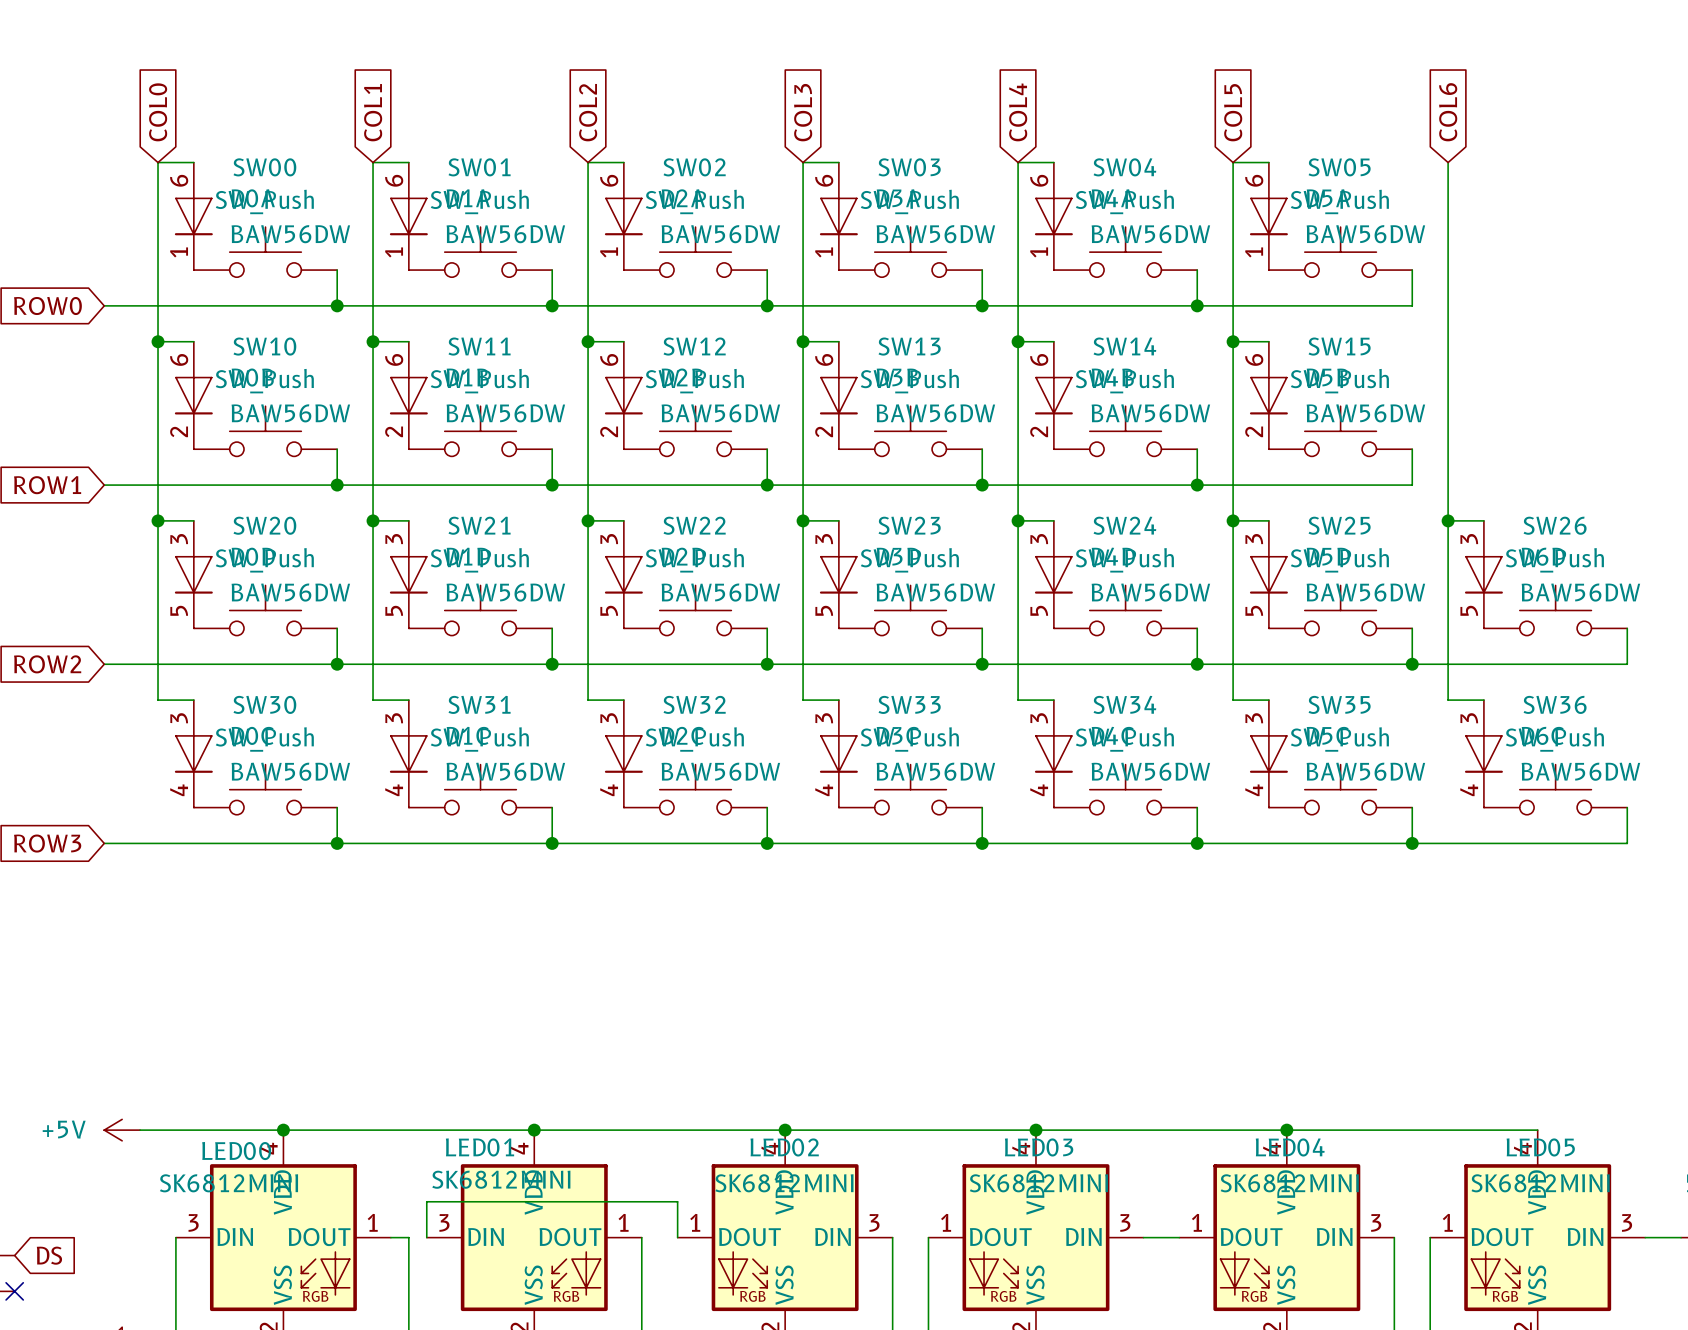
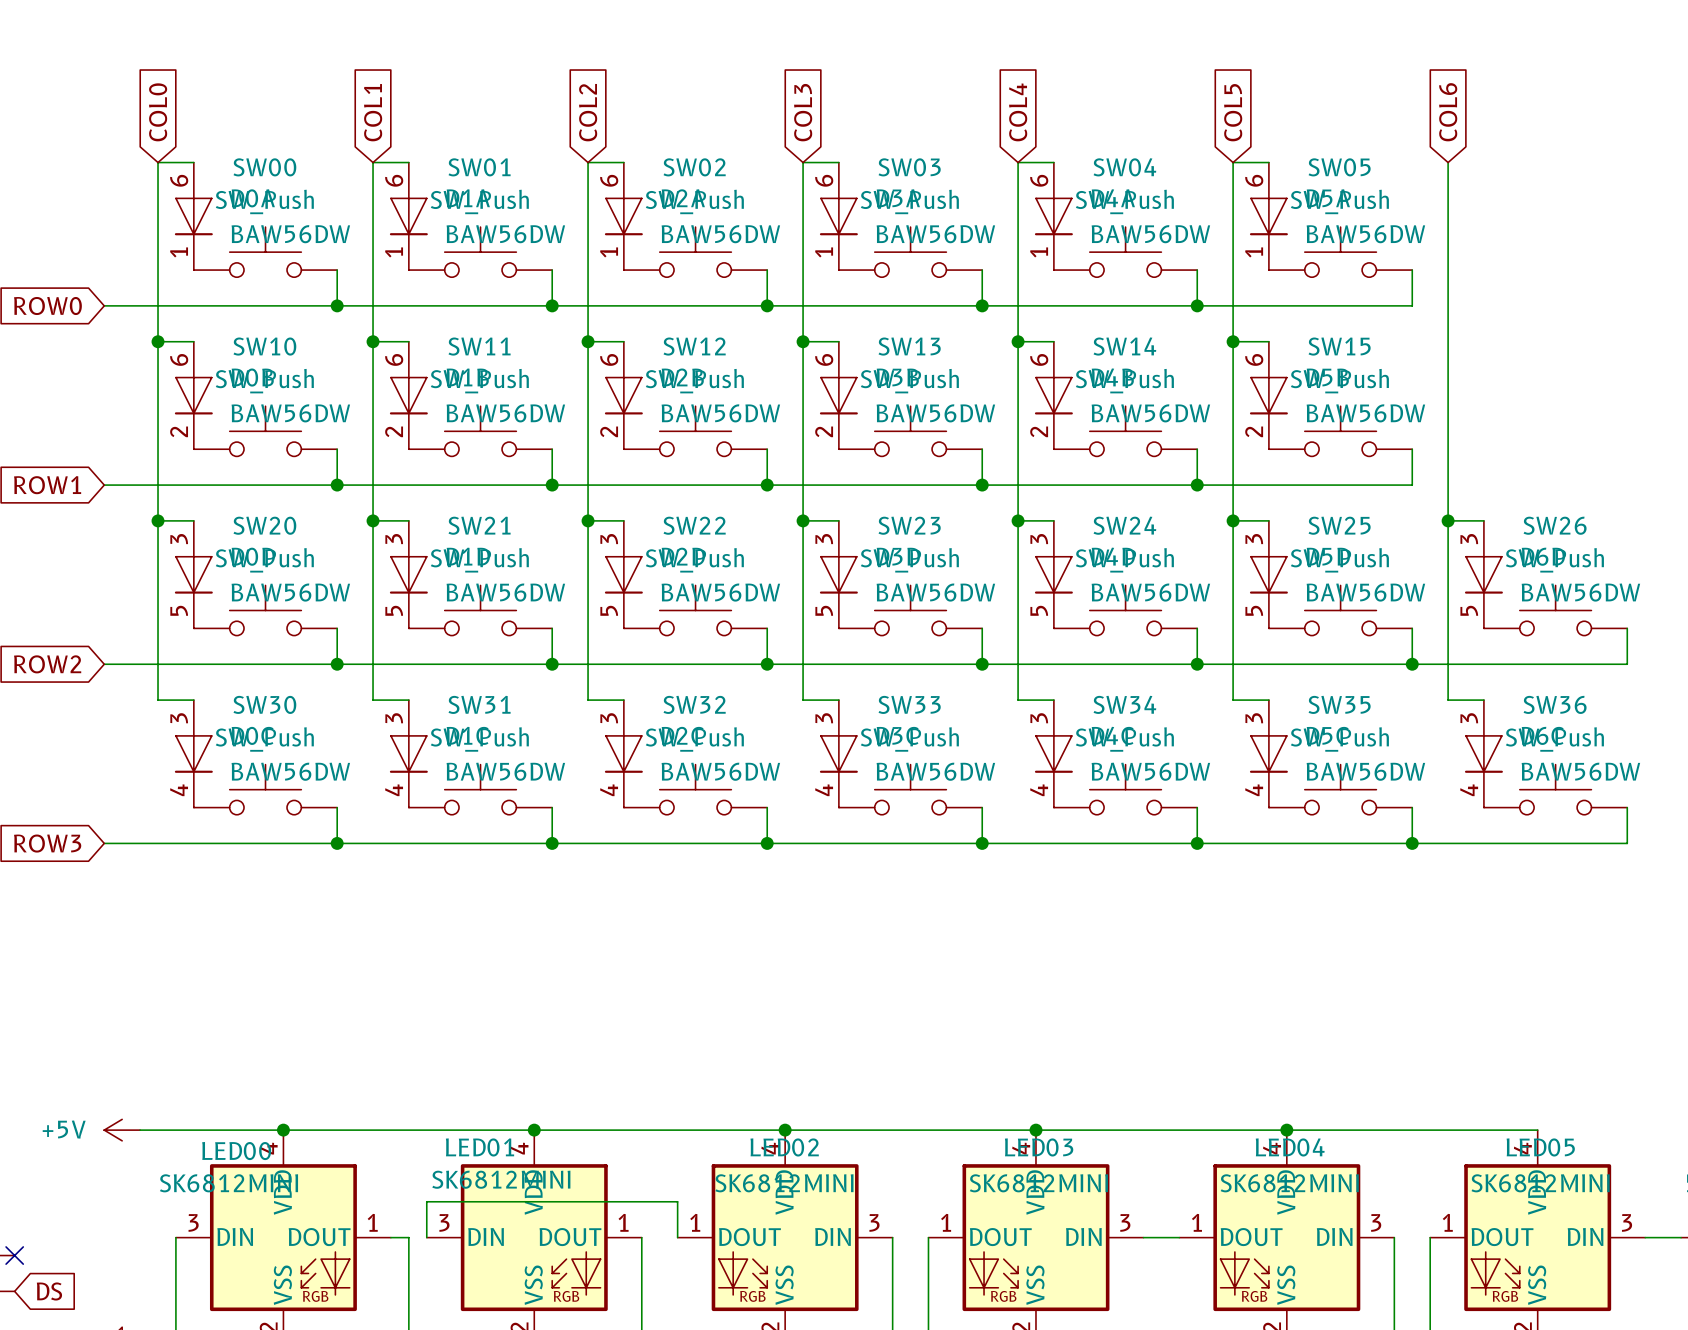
global label position: DS (49, 1255) -> DS (49, 1291)
no-connect mark position: (14, 1291) -> (14, 1255)

